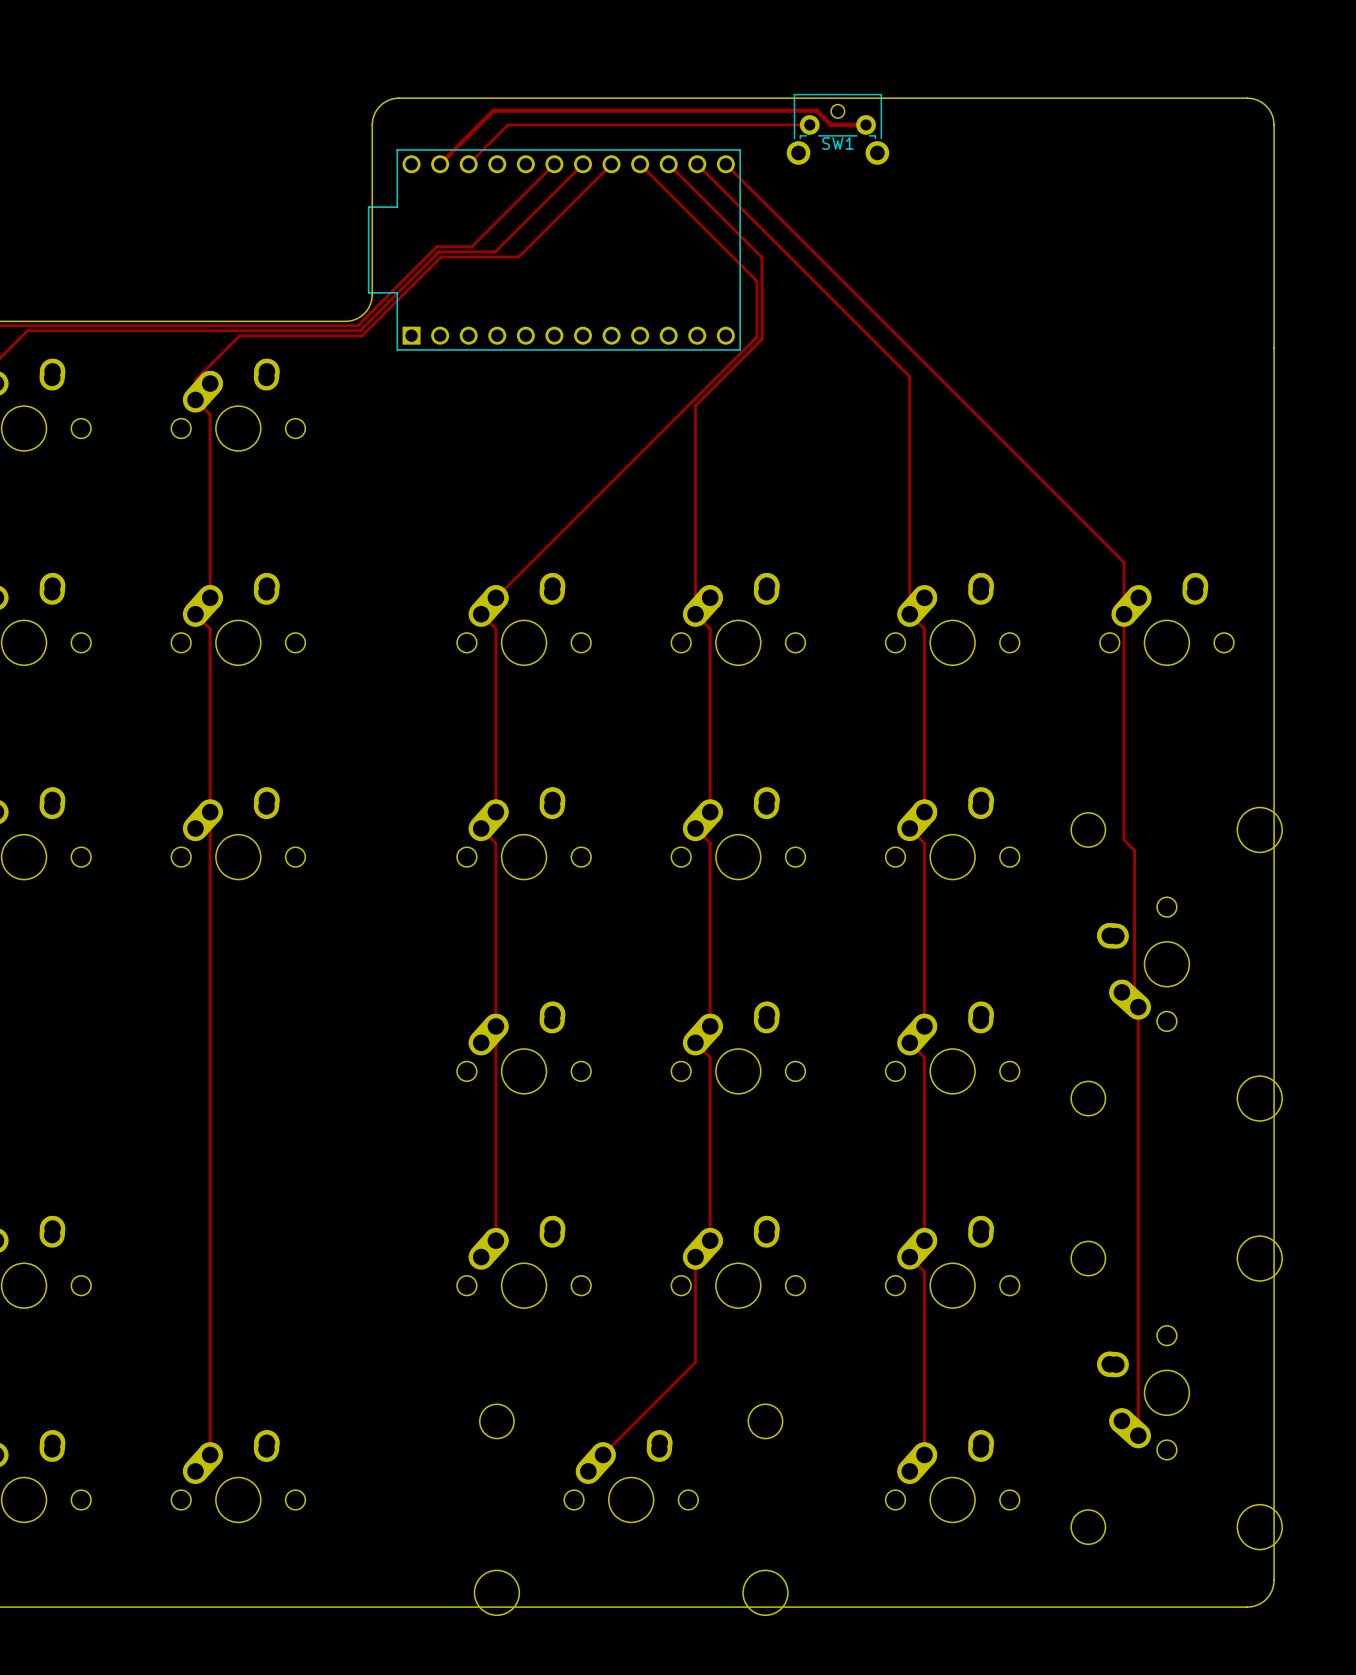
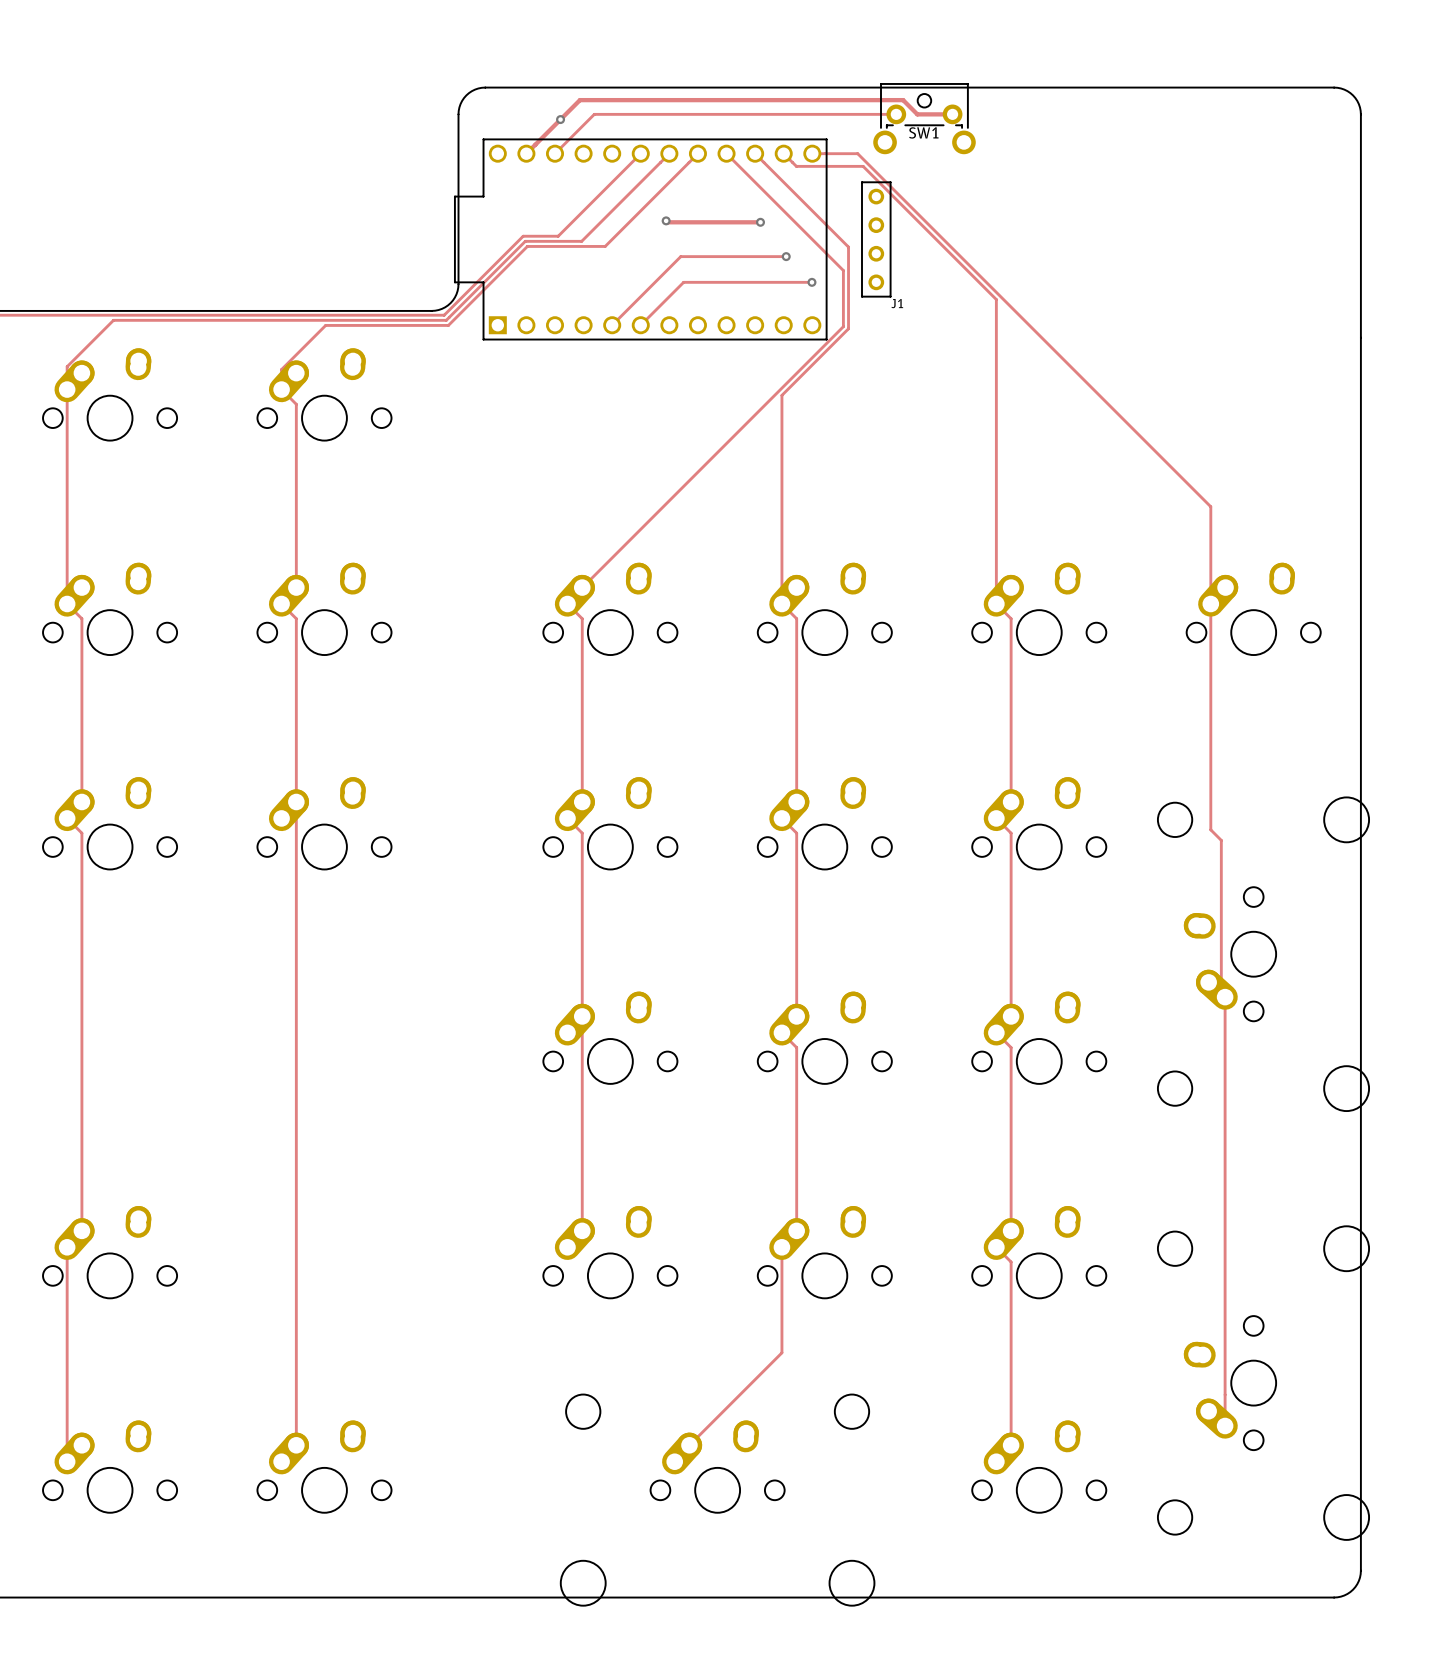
via: none -> (560, 119)
track: (725, 164) (1124, 562) -> (812, 153) (857, 153) (1210, 506) (1210, 552)
track: (706, 173) (909, 376) -> (792, 162) (796, 166) (863, 166) (996, 299) (996, 366)
track: none -> (666, 220) (760, 222)
via: none -> (666, 220)
via: none -> (760, 222)
J1: none -> (876, 239)
track: none -> (786, 256) (680, 256) (612, 325)
via: none -> (786, 256)
track: none -> (811, 282) (683, 282) (640, 325)
via: none -> (811, 282)

